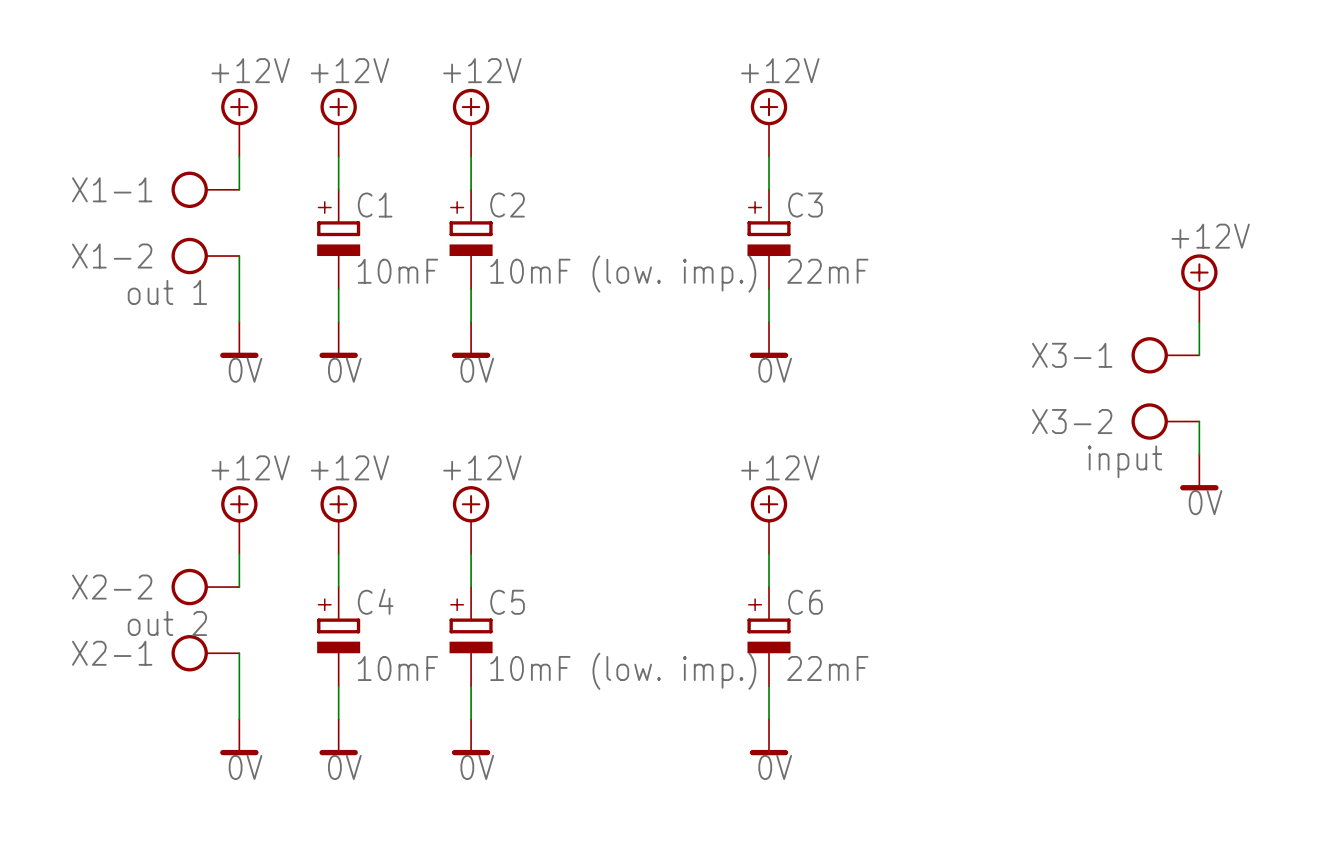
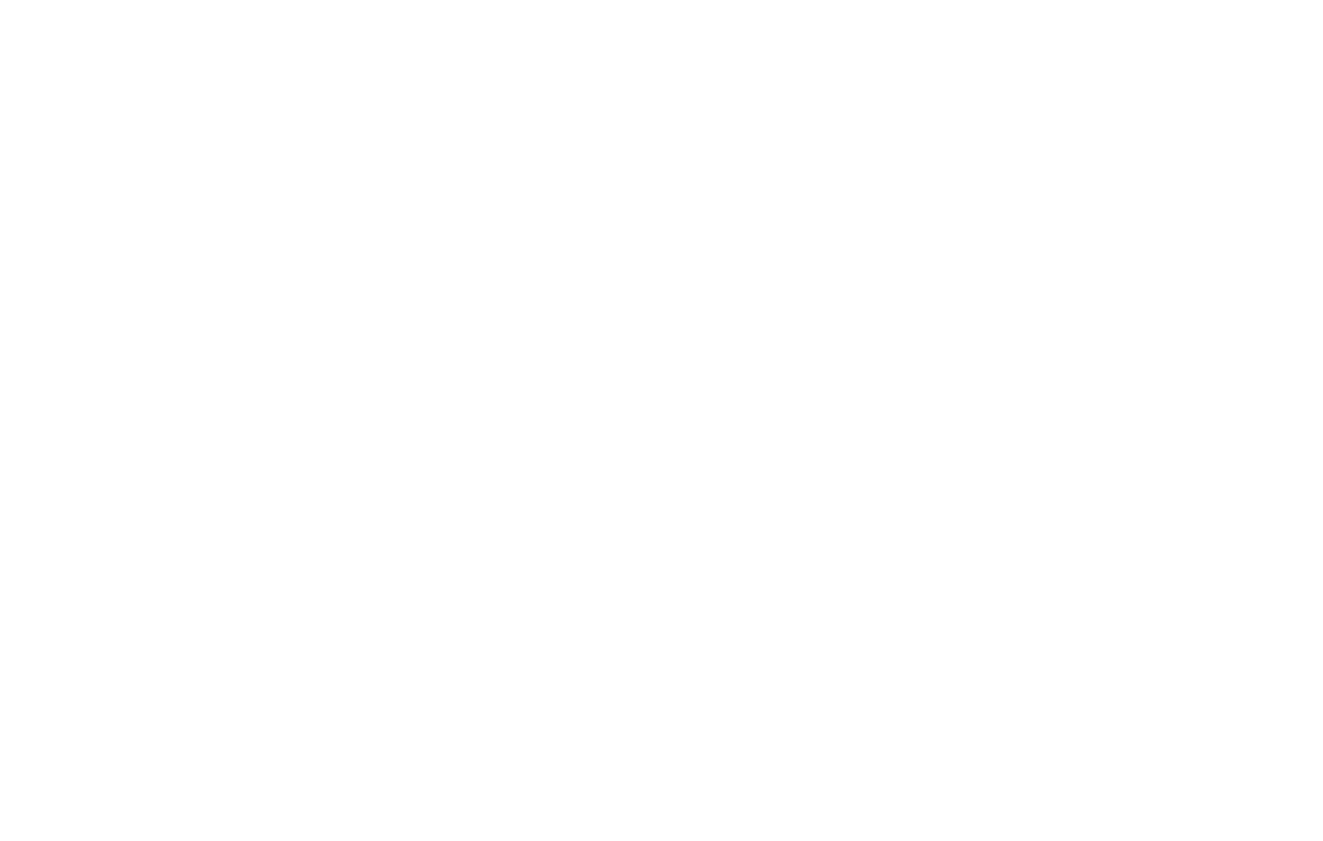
power symbol: +12V (239, 122) -> none
power symbol: +12V (338, 122) -> none
power symbol: +12V (471, 122) -> none
power symbol: +12V (769, 122) -> none
wire: (239, 156) (239, 189) -> none
wire: (338, 156) (338, 189) -> none
wire: (471, 156) (471, 189) -> none
wire: (769, 156) (769, 189) -> none
X1-1: (205, 189) -> none
C1: 10mF (338, 239) -> none
C2: 10mF (low. imp.) (471, 239) -> none
C3: 22mF (769, 239) -> none
X1-2: out 1 (205, 256) -> none
wire: (239, 256) (239, 322) -> none
power symbol: +12V (1199, 288) -> none
wire: (338, 289) (338, 322) -> none
wire: (471, 289) (471, 322) -> none
wire: (769, 289) (769, 322) -> none
wire: (1199, 322) (1199, 355) -> none
power symbol: 0V (239, 340) -> none
power symbol: 0V (338, 340) -> none
power symbol: 0V (471, 340) -> none
power symbol: 0V (769, 340) -> none
X3-1: (1165, 355) -> none
X3-2: input (1165, 421) -> none
wire: (1199, 421) (1199, 454) -> none
power symbol: 0V (1199, 472) -> none
power symbol: +12V (239, 520) -> none
power symbol: +12V (338, 520) -> none
power symbol: +12V (471, 520) -> none
power symbol: +12V (769, 520) -> none
wire: (239, 553) (239, 587) -> none
wire: (338, 553) (338, 587) -> none
wire: (471, 553) (471, 587) -> none
wire: (769, 553) (769, 587) -> none
X2-2: out 2 (205, 587) -> none
C4: 10mF (338, 636) -> none
C5: 10mF (low. imp.) (471, 636) -> none
C6: 22mF (769, 636) -> none
X2-1: (205, 653) -> none
wire: (239, 653) (239, 719) -> none
wire: (338, 686) (338, 719) -> none
wire: (471, 686) (471, 719) -> none
wire: (769, 686) (769, 719) -> none
power symbol: 0V (239, 737) -> none
power symbol: 0V (338, 737) -> none
power symbol: 0V (471, 737) -> none
power symbol: 0V (769, 737) -> none

